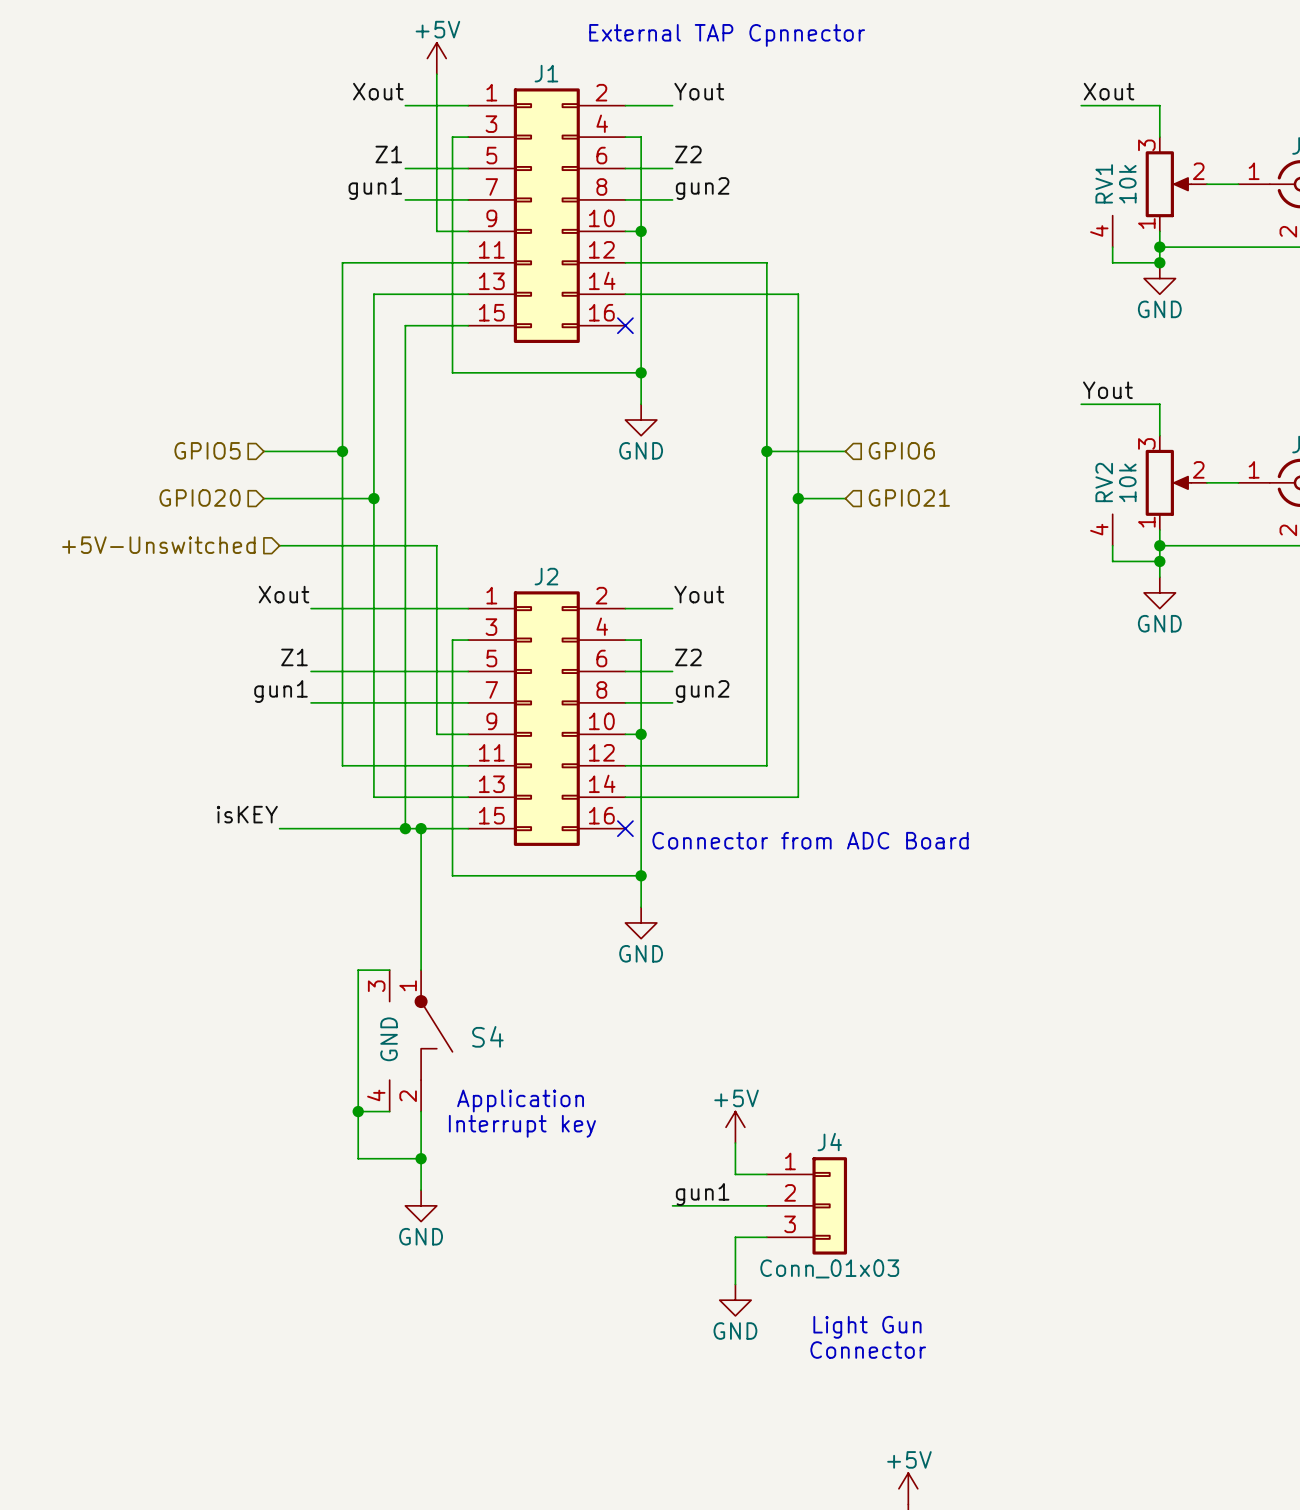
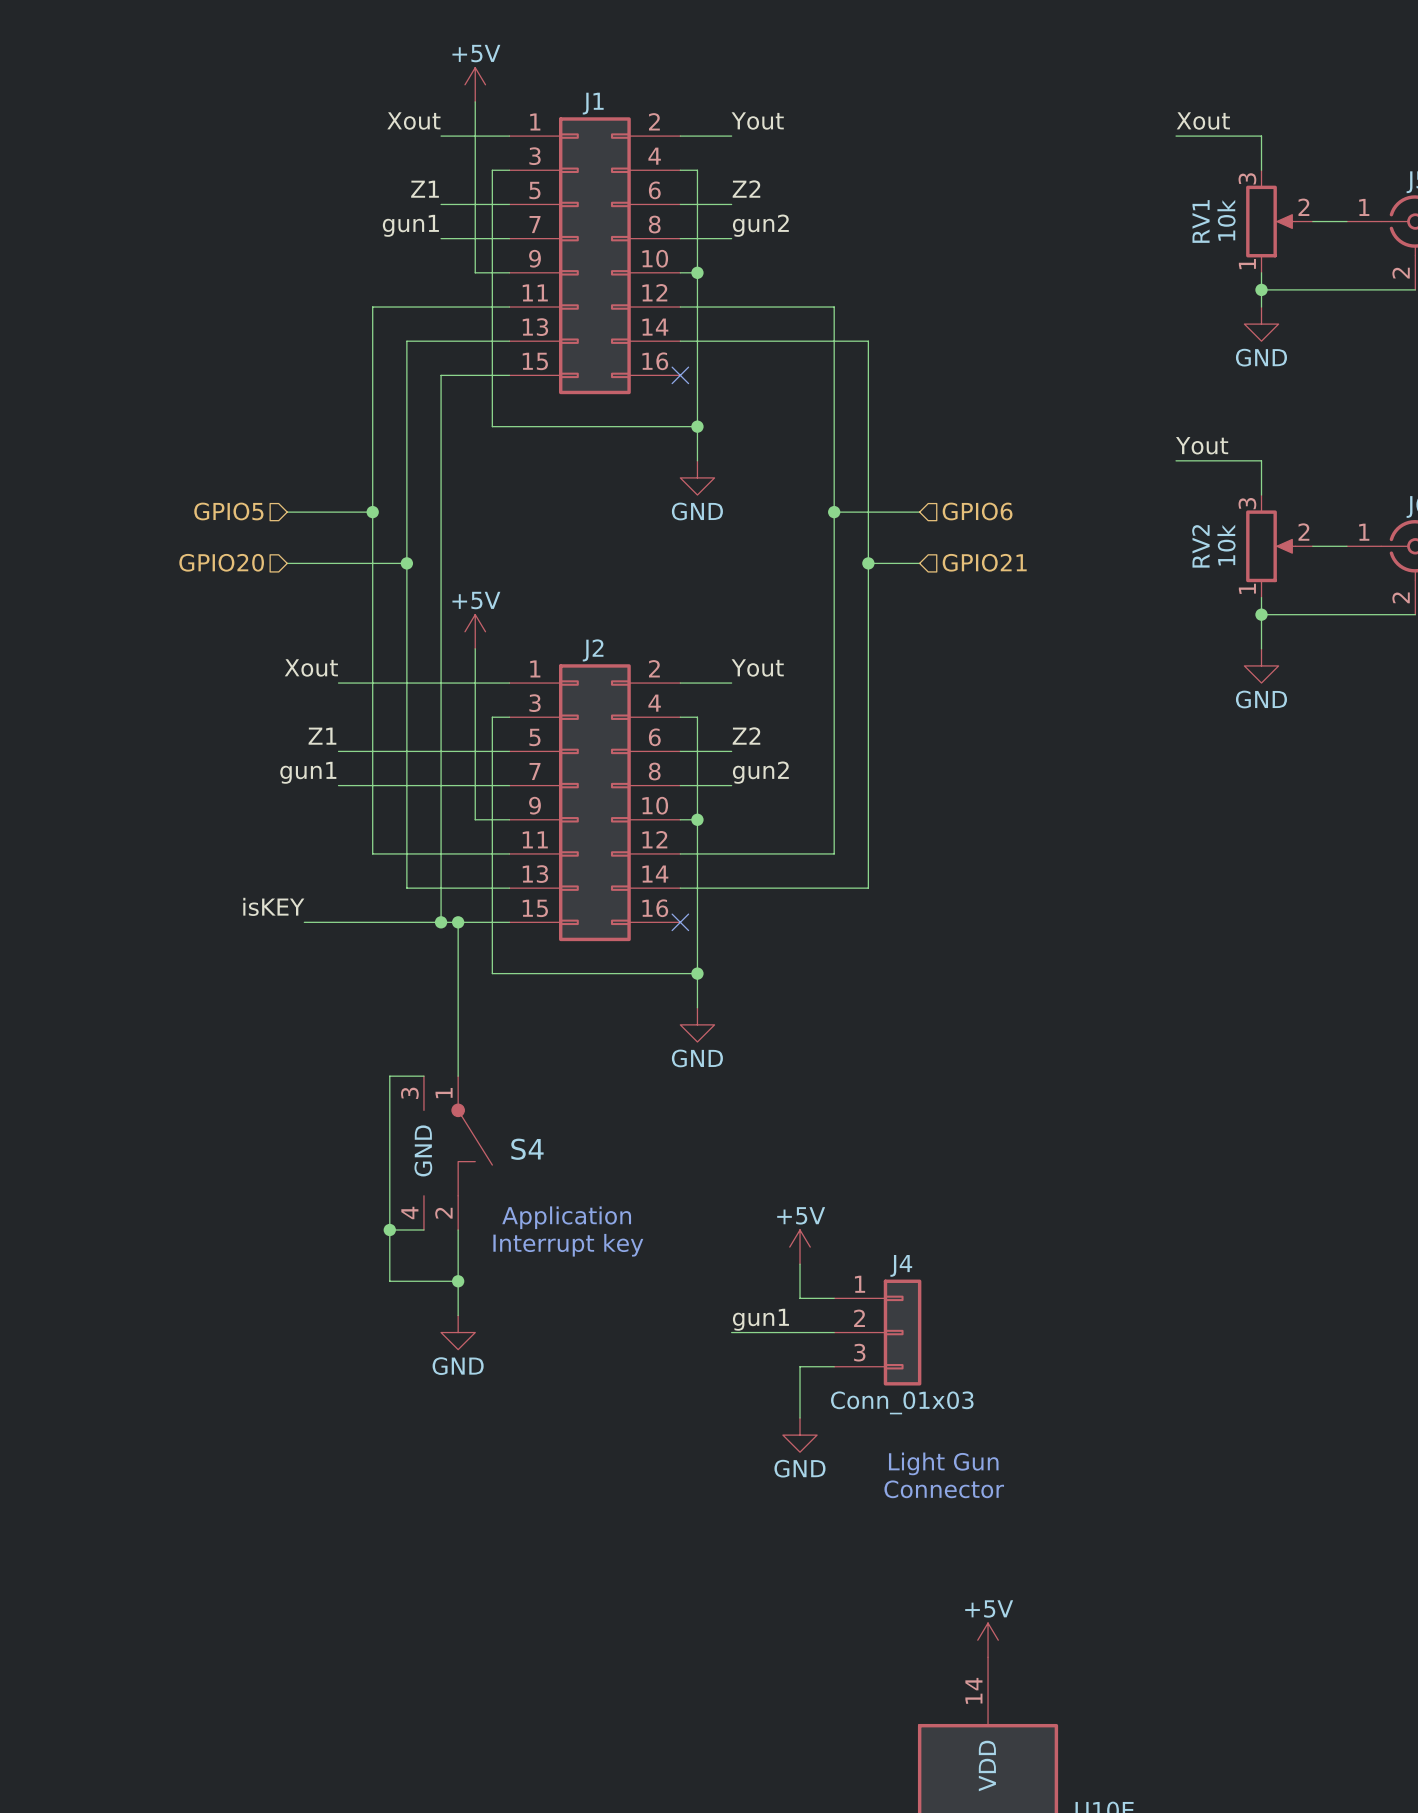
text: External TAP Cpnnector (727, 35) -> none
RV1 symbol: [1112, 137, 1207, 248] -> [1246, 170, 1313, 273]
wire: (1112, 247) (1112, 262) (1159, 262) -> none
junction: (1159, 262) -> none
RV2 symbol: [1112, 435, 1207, 546] -> [1246, 495, 1313, 598]
hierarchical label: +5V-Unswitched (158, 545) -> none
wire: (279, 545) (436, 545) (436, 577) -> none
wire: (1112, 545) (1112, 561) (1159, 561) -> none
power symbol: none -> +5V (475, 631)
junction: (1159, 561) -> none
text: Connector from ADC Board (810, 840) -> none

